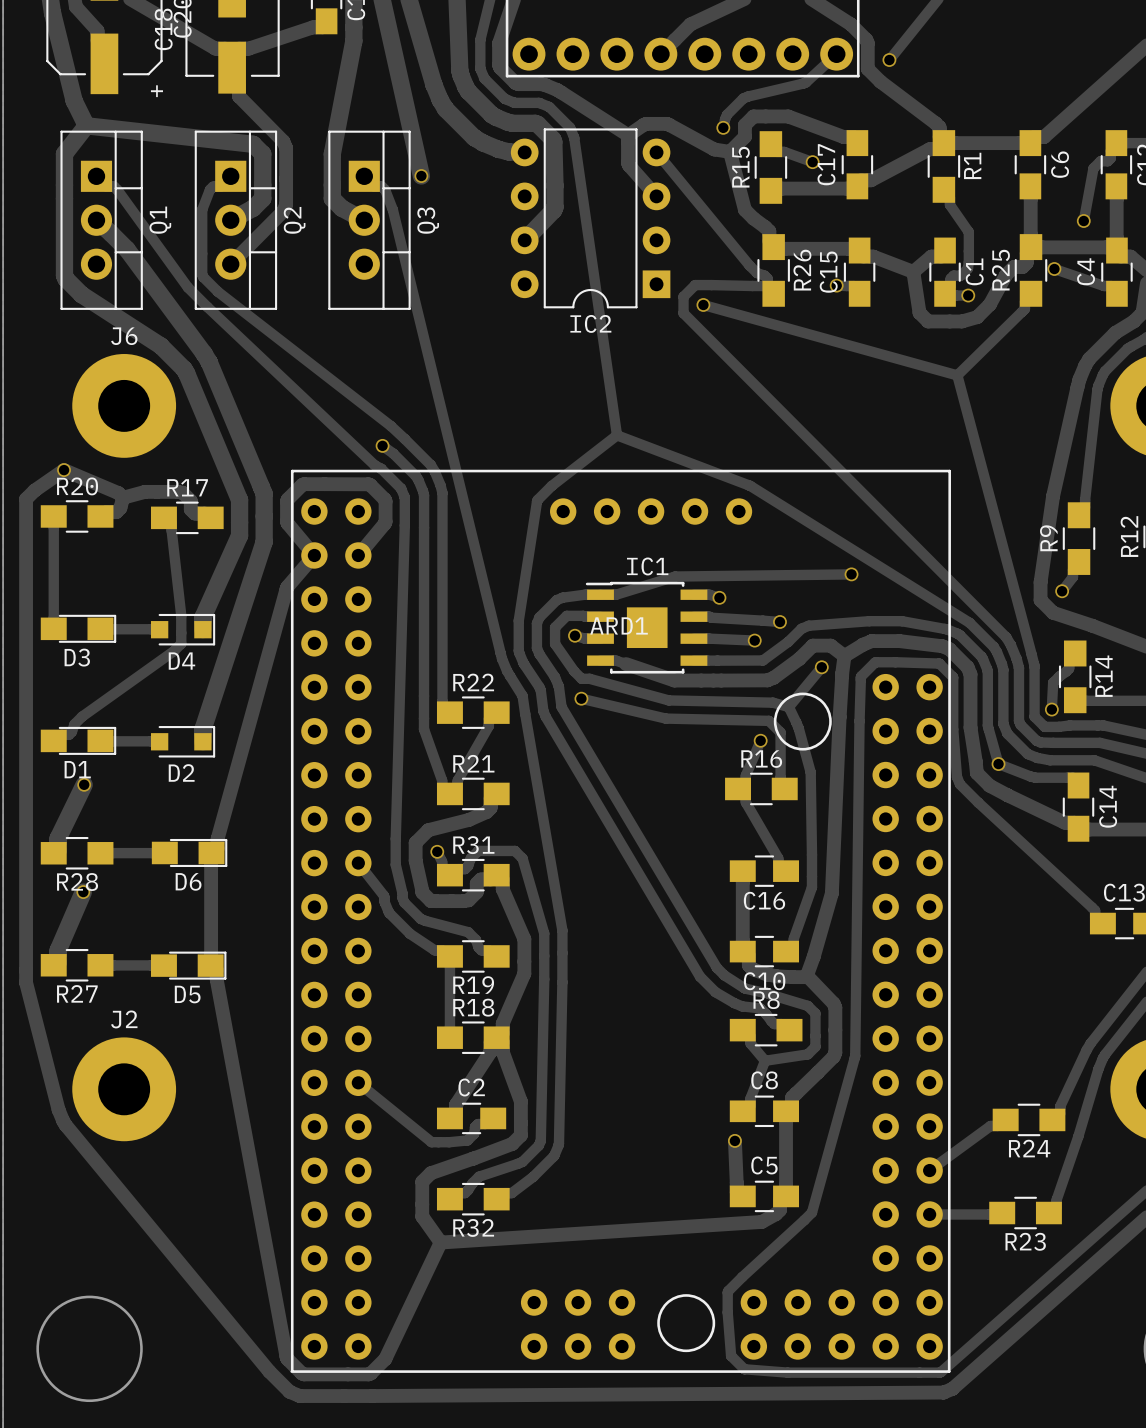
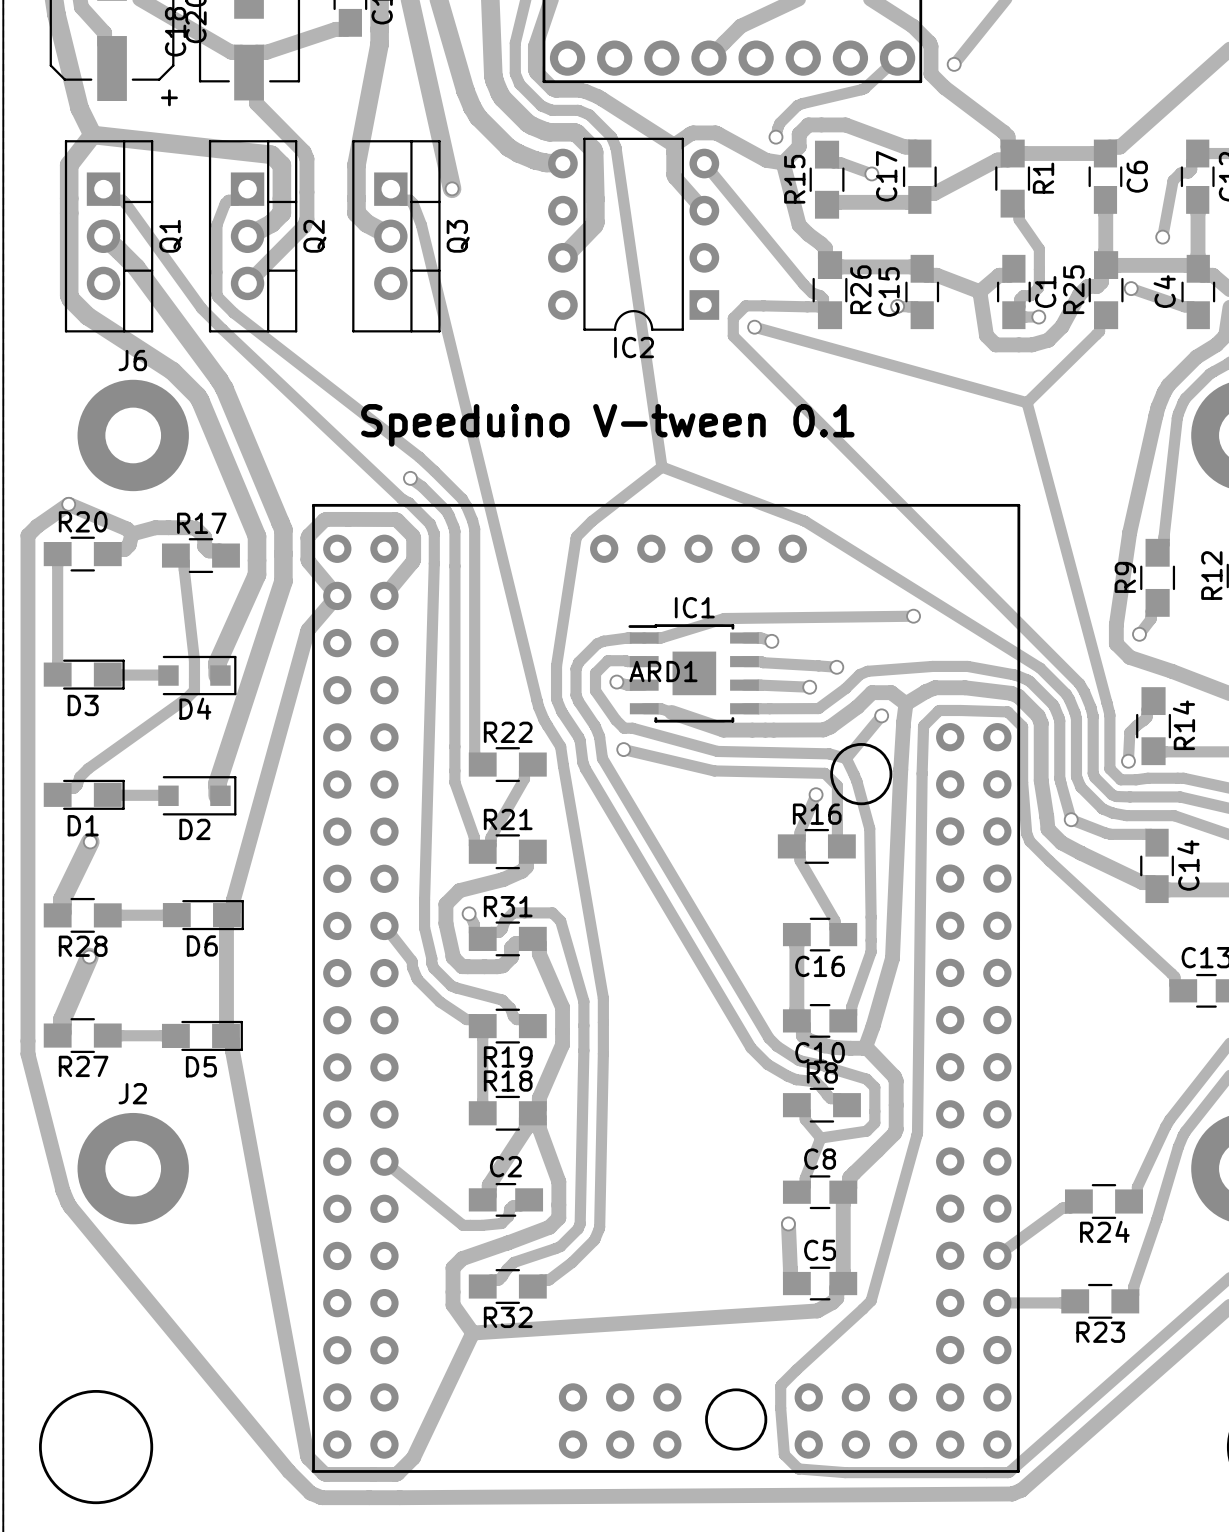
text: none -> Speeduino V-tween 0.1 (607, 425)
D4 footprint: [150, 613, 216, 646] -> [158, 655, 237, 696]
D2 footprint: [150, 726, 216, 758] -> [158, 776, 237, 816]

